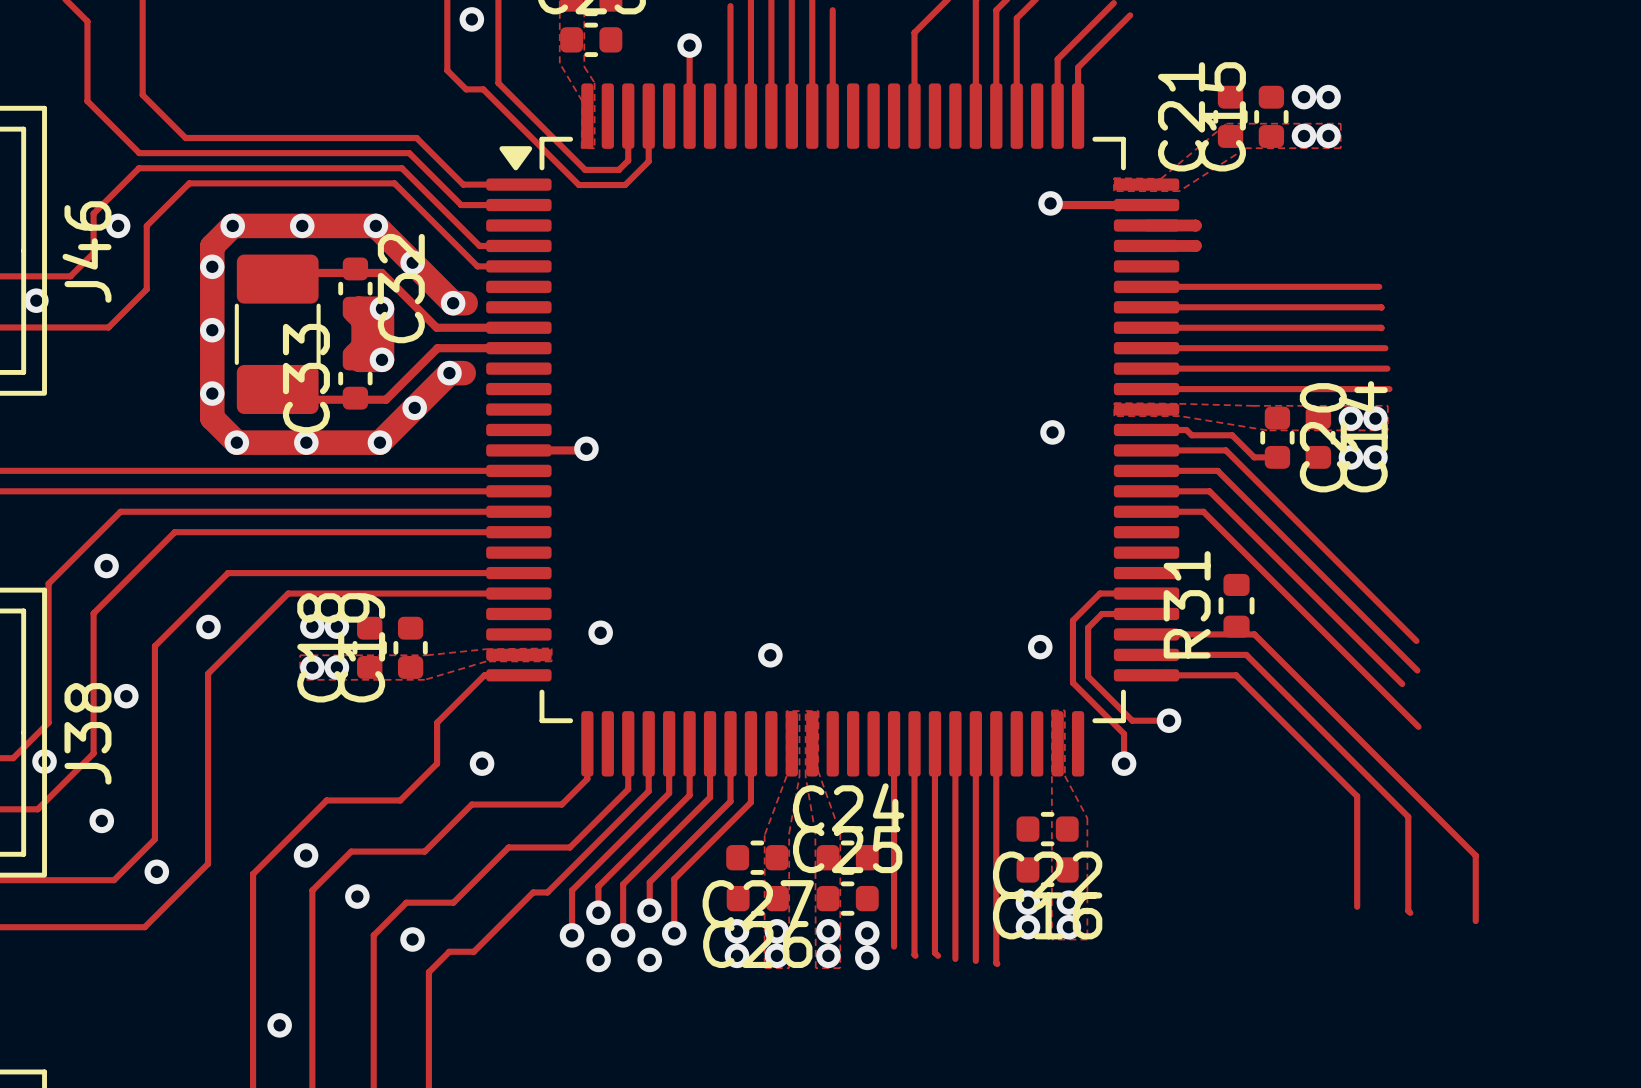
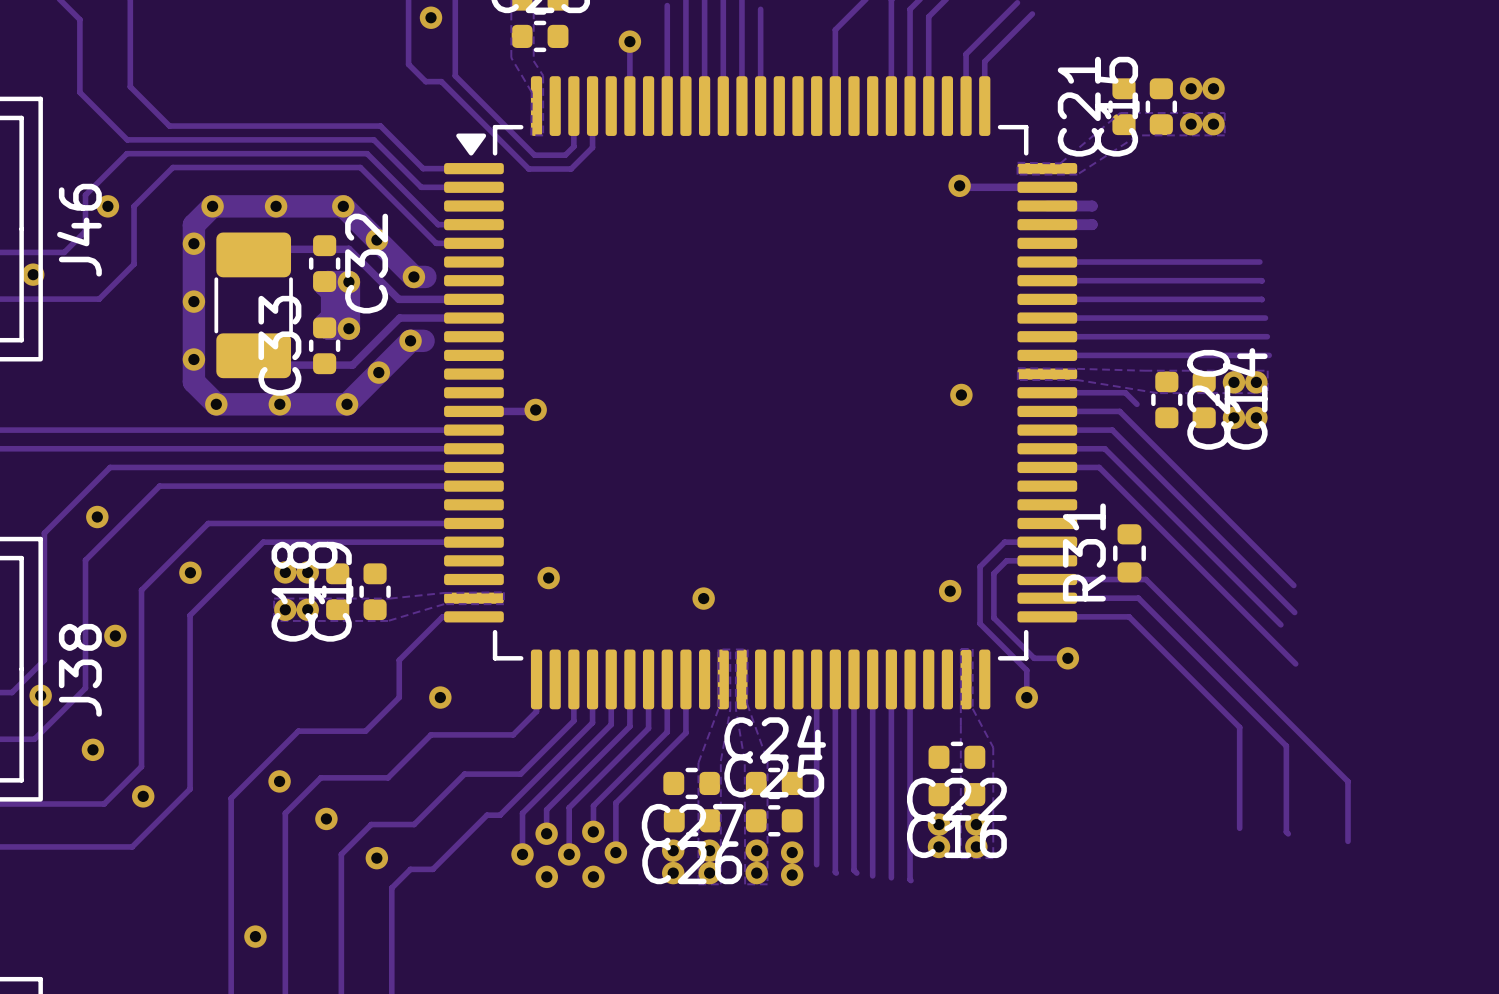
track: (1186, 429) (1191, 435) (1232, 435) (1254, 457) (1277, 457) -> (1083, 392) (1125, 392) (1136, 404)

